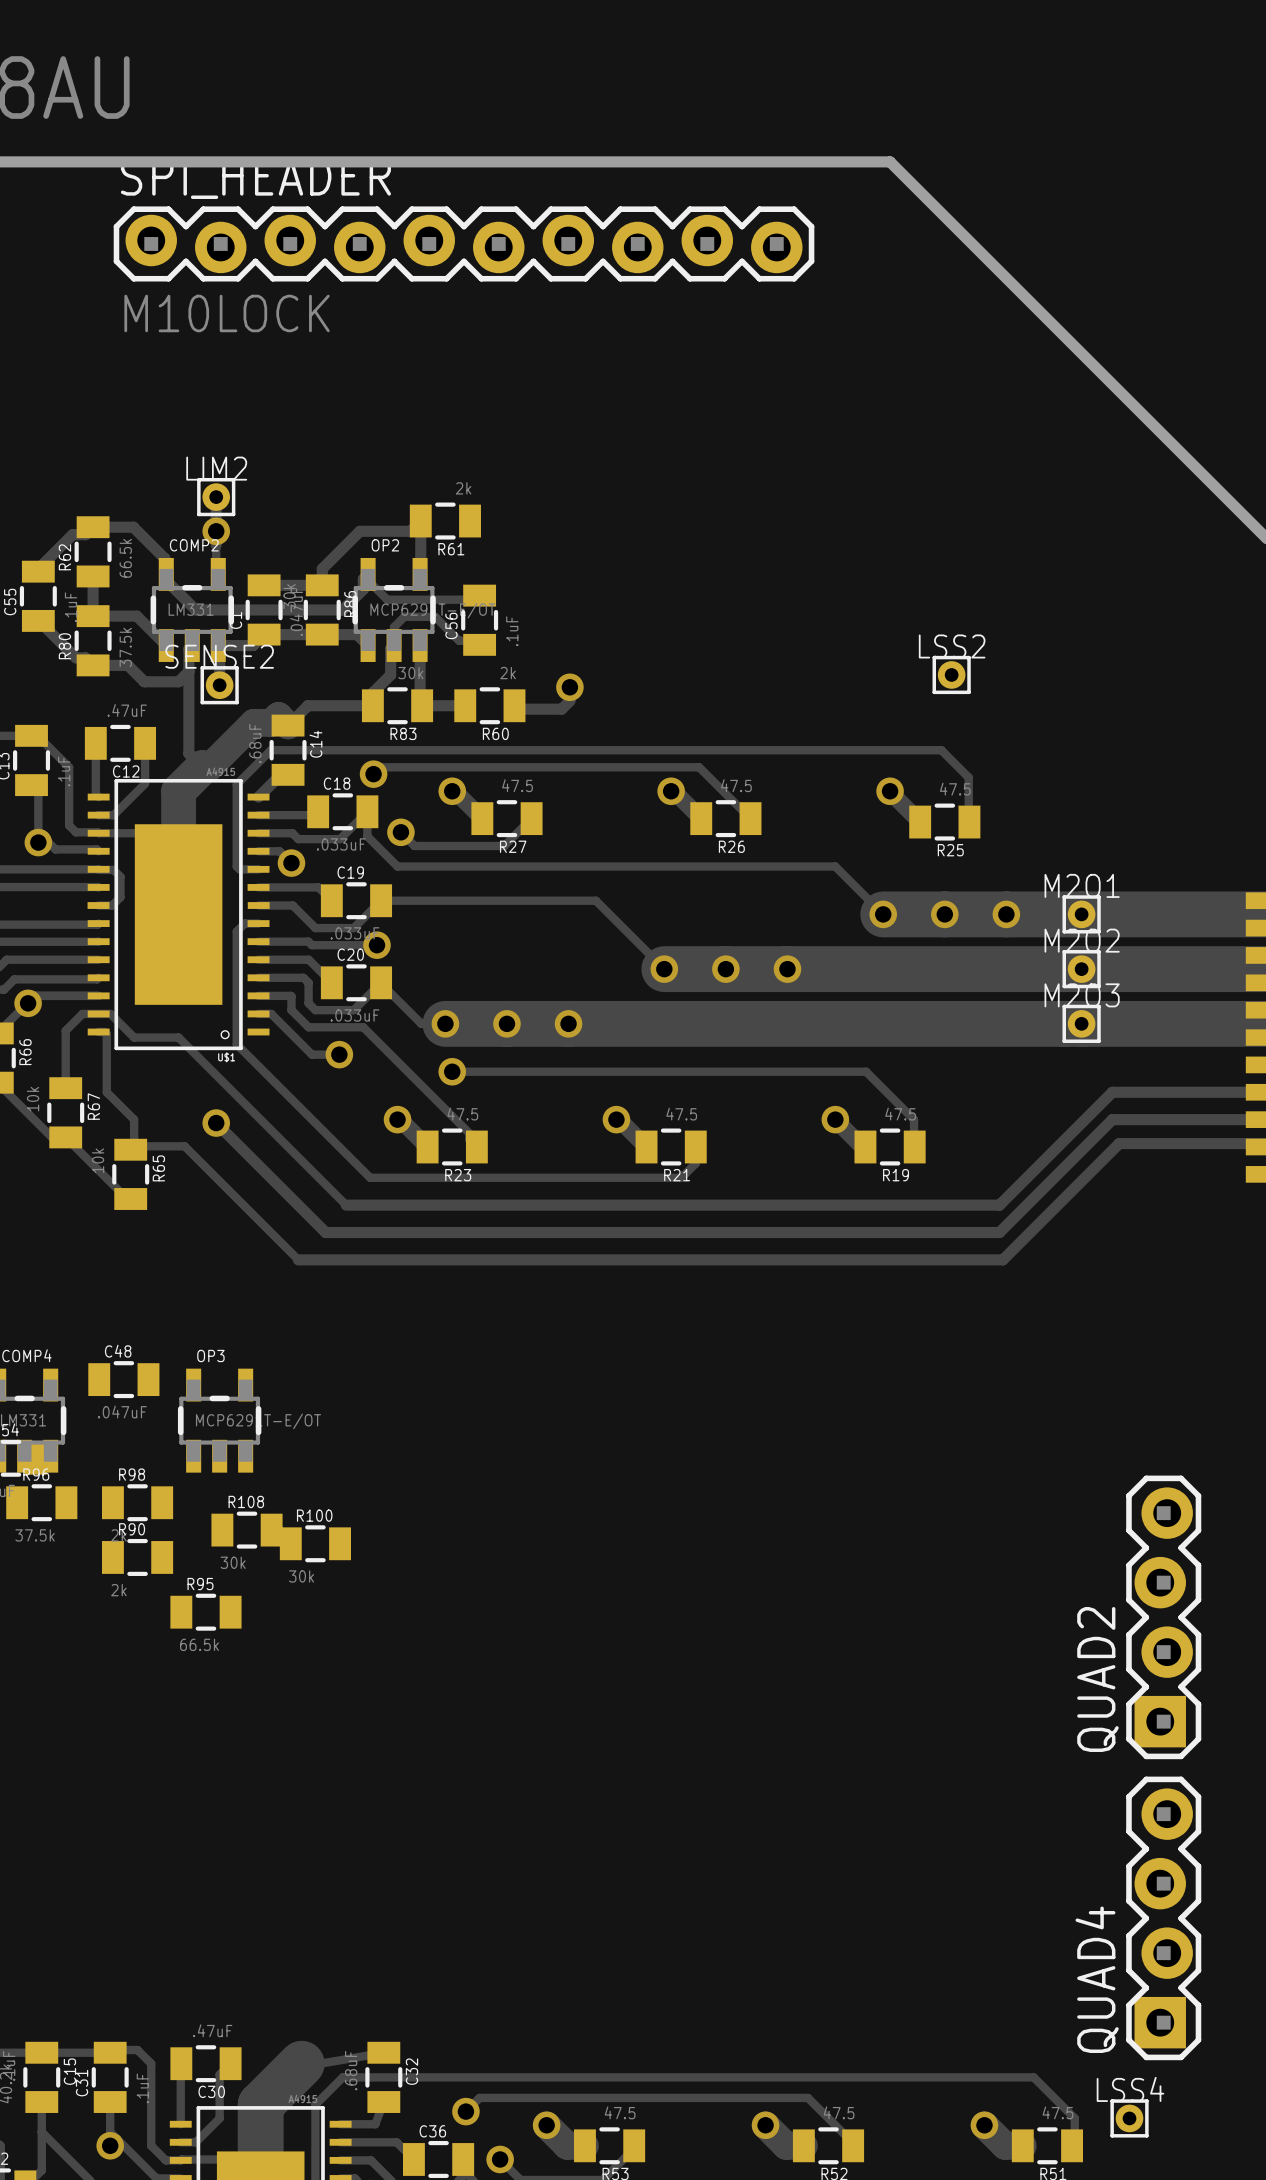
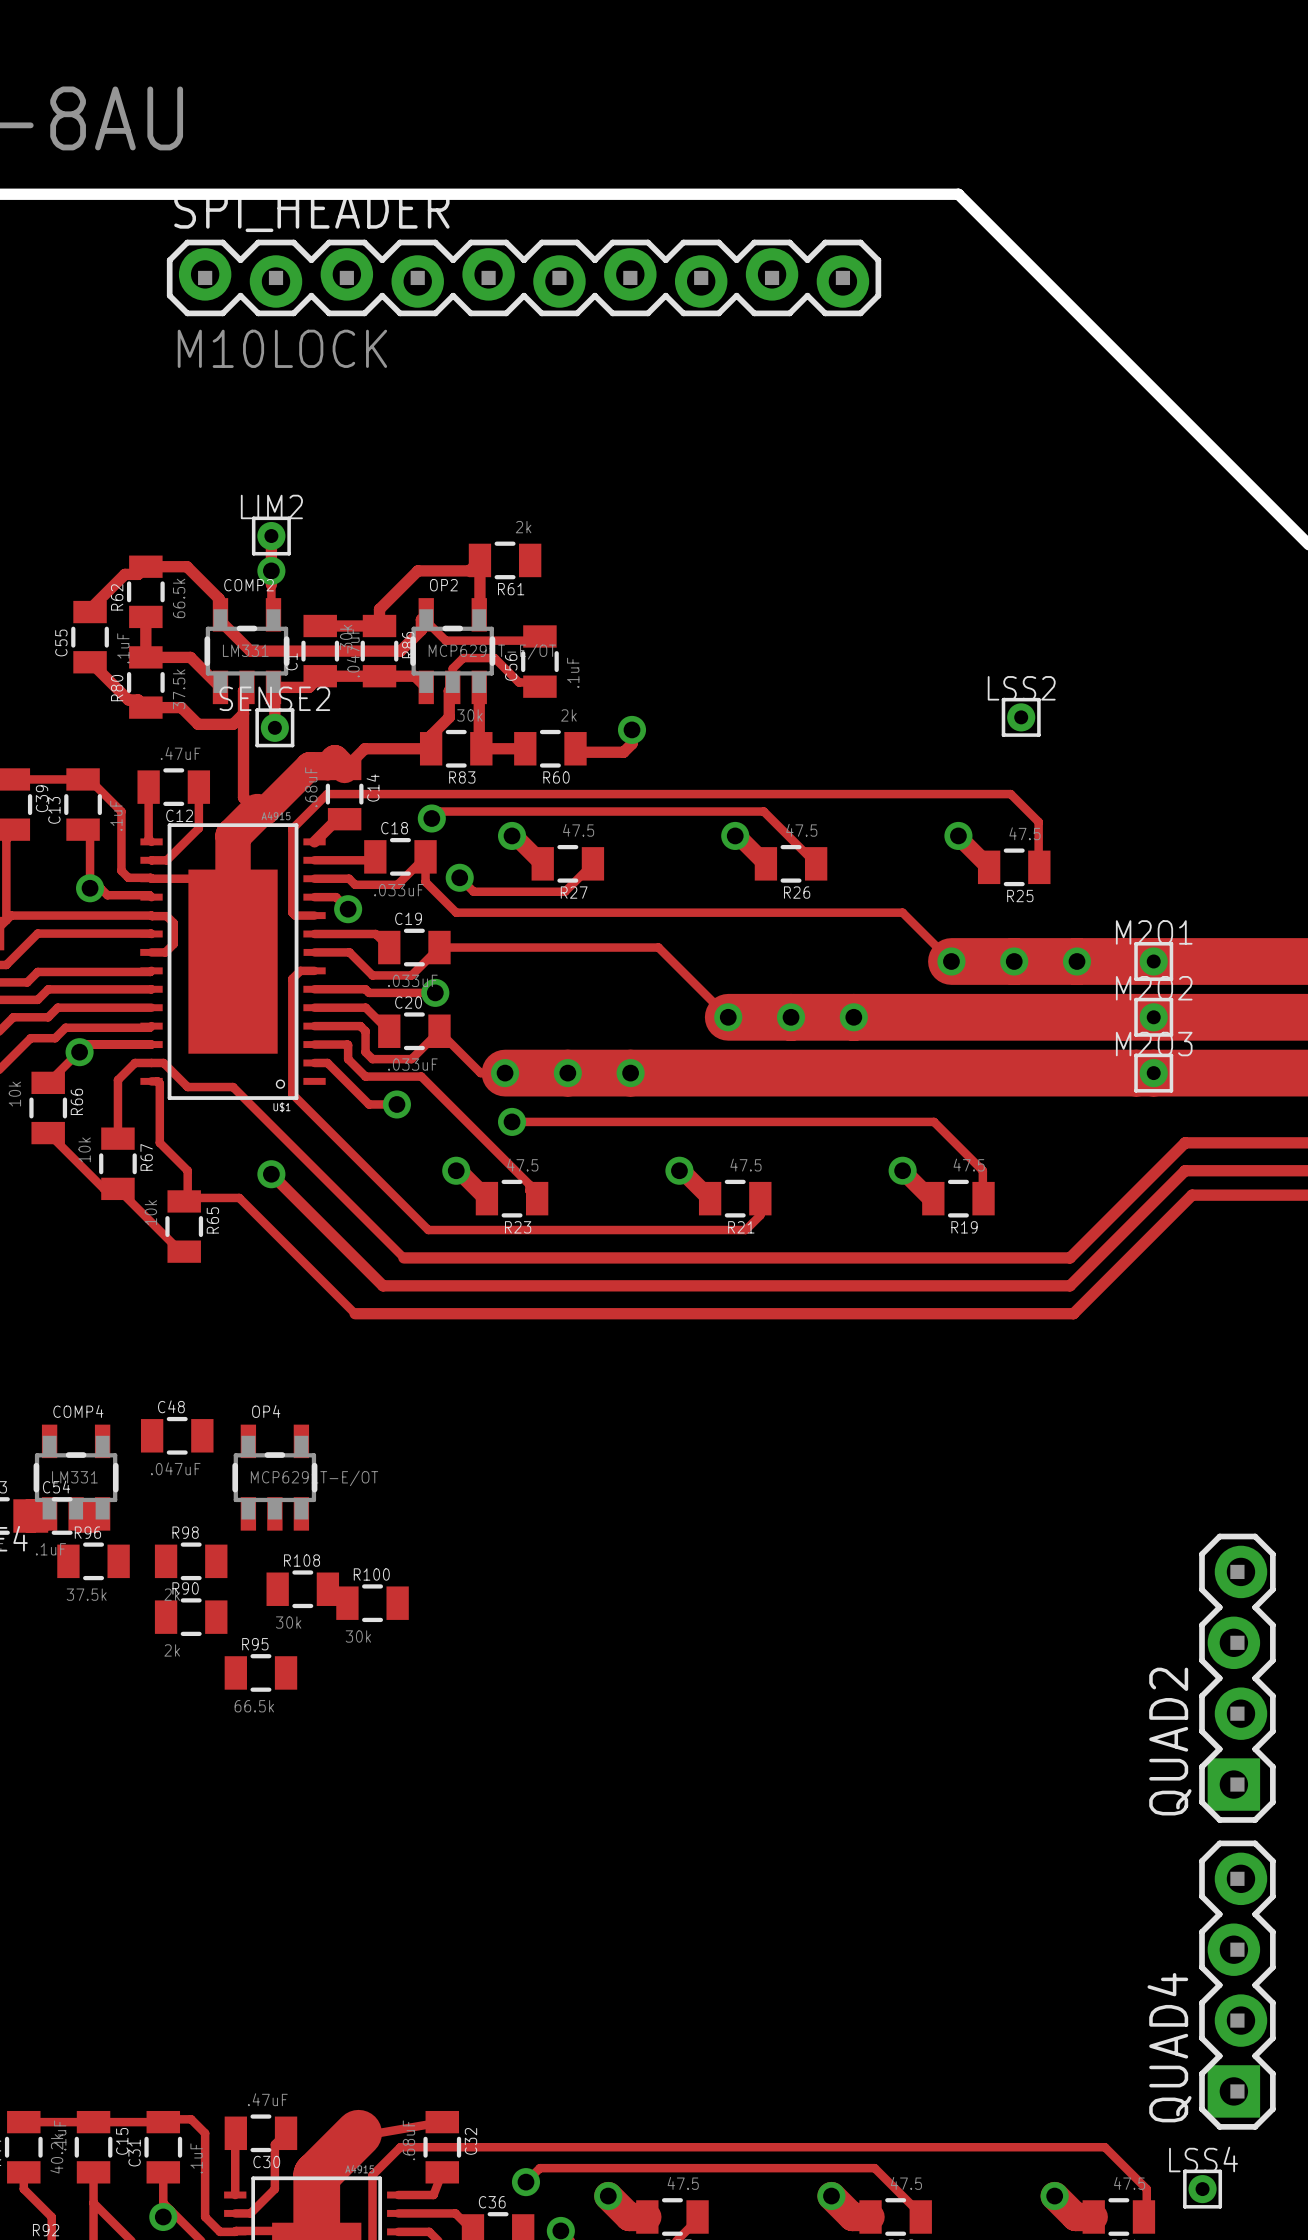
OP3 name: OP3 (210, 1356) -> OP4 (266, 1411)

